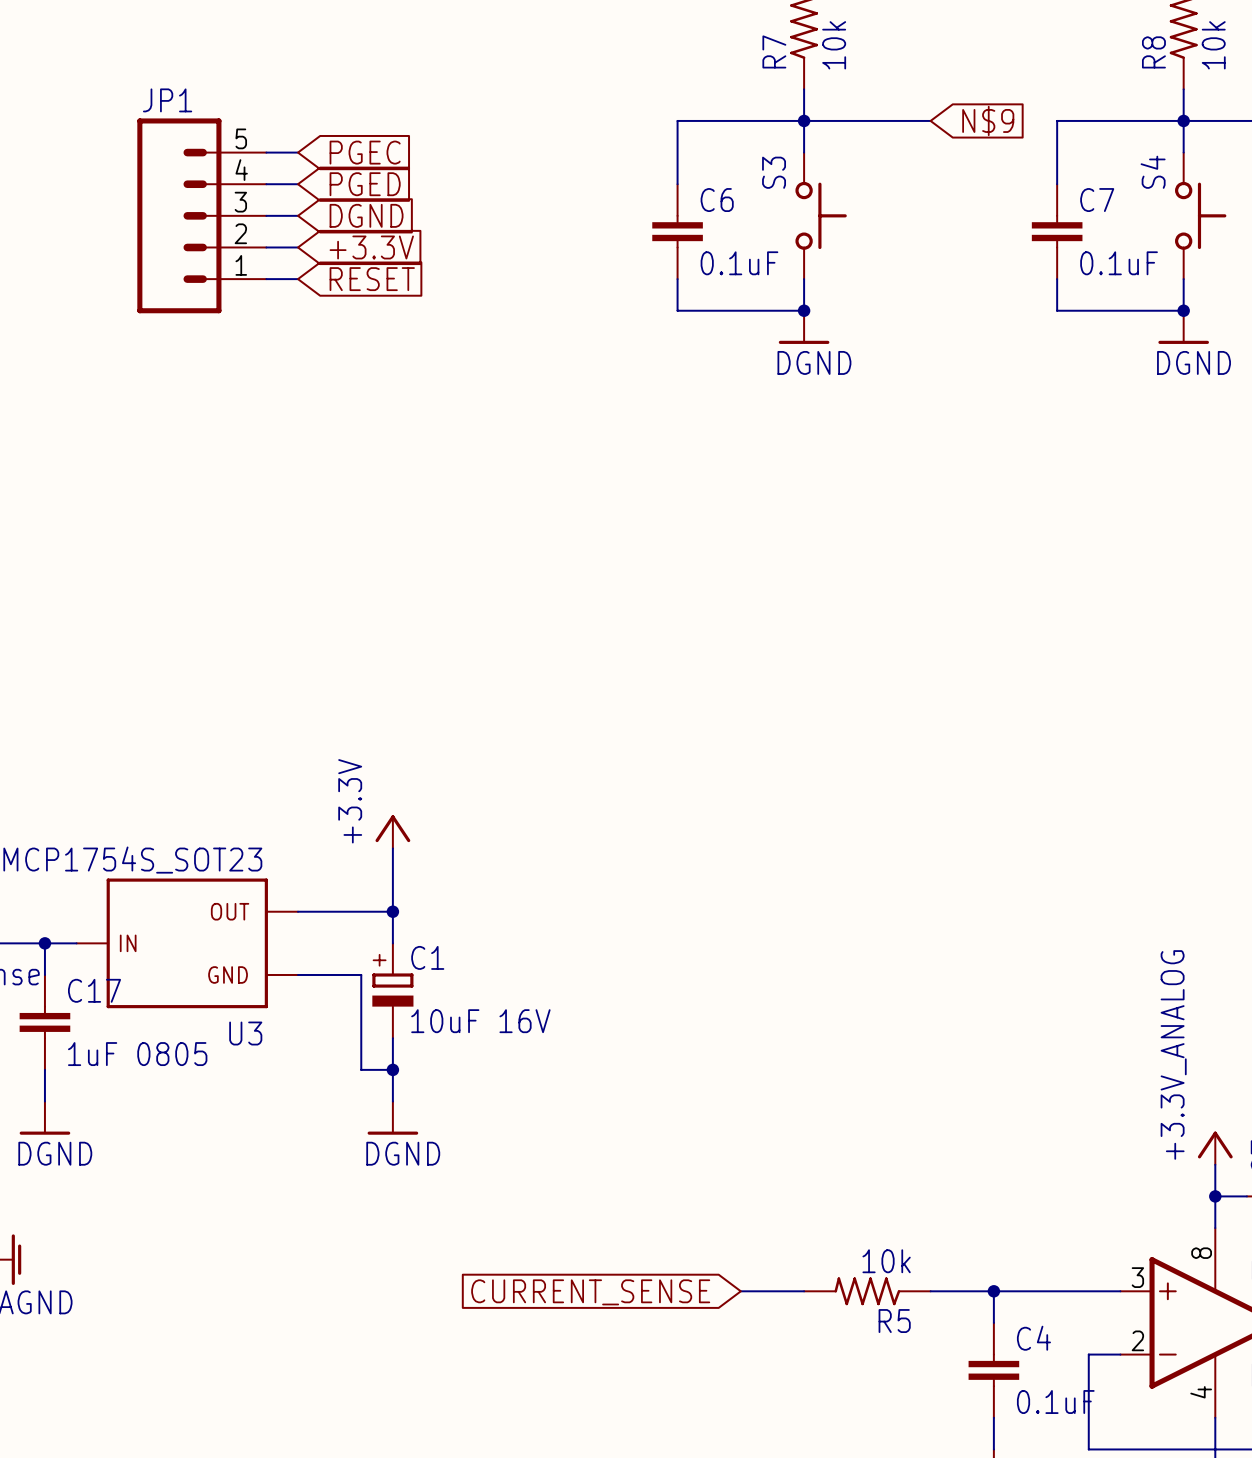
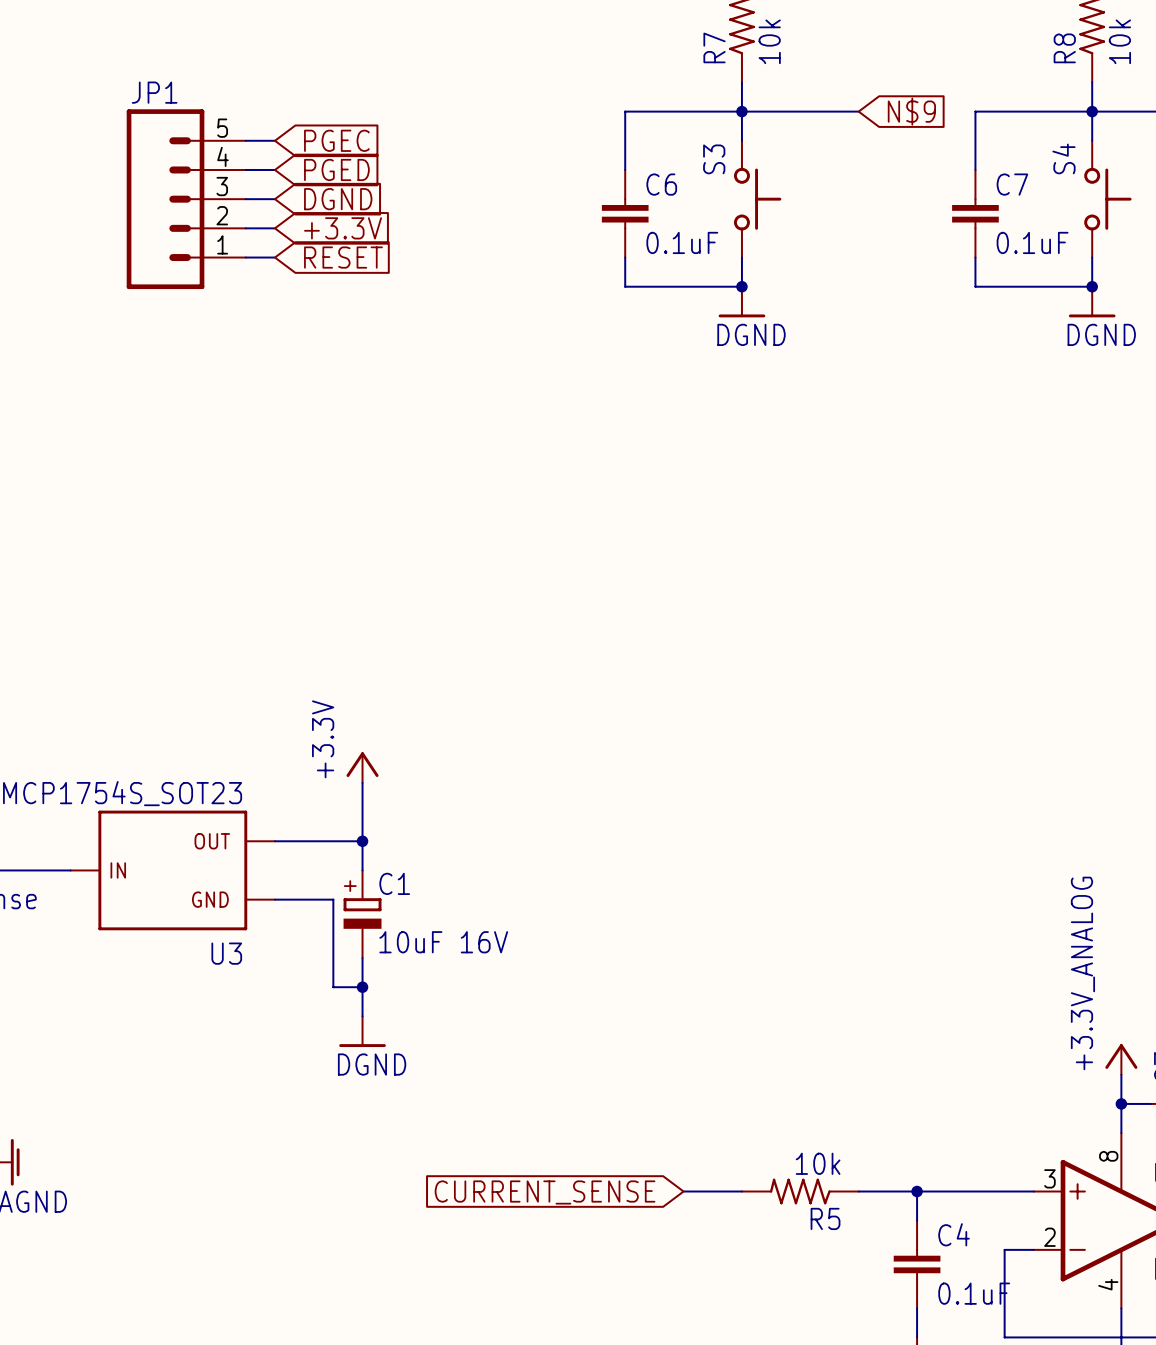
wire: (44, 943) (44, 974) -> none
junction: (44, 943) -> none
C17: 1uF 0805 (44, 1022) -> none
wire: (44, 1069) (44, 1101) -> none
power symbol: DGND (44, 1118) -> none

